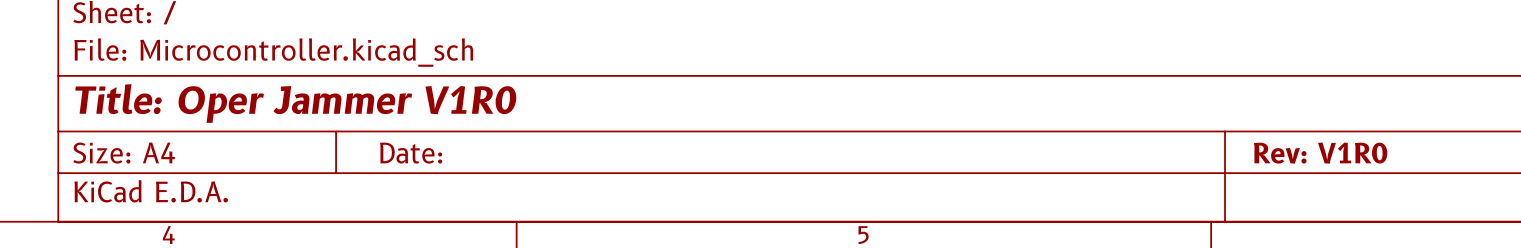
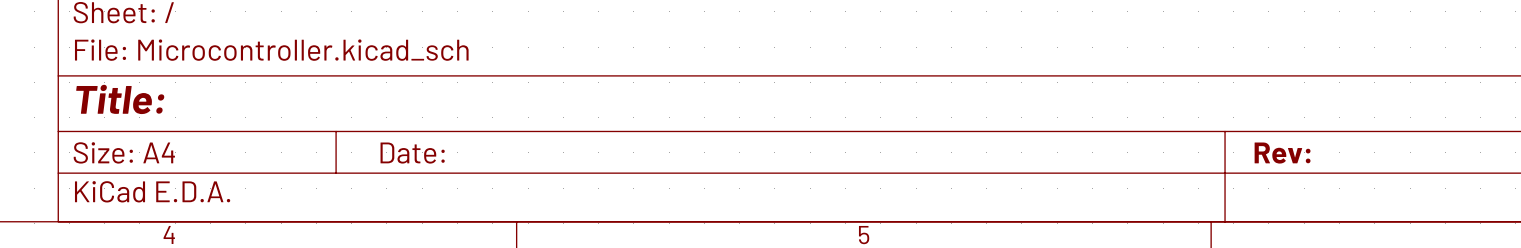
title block: Title: Oper Jammer V1R0 (295, 103) -> Title: (120, 99)
title block: Rev: V1R0 (1320, 153) -> Rev: (1282, 153)

